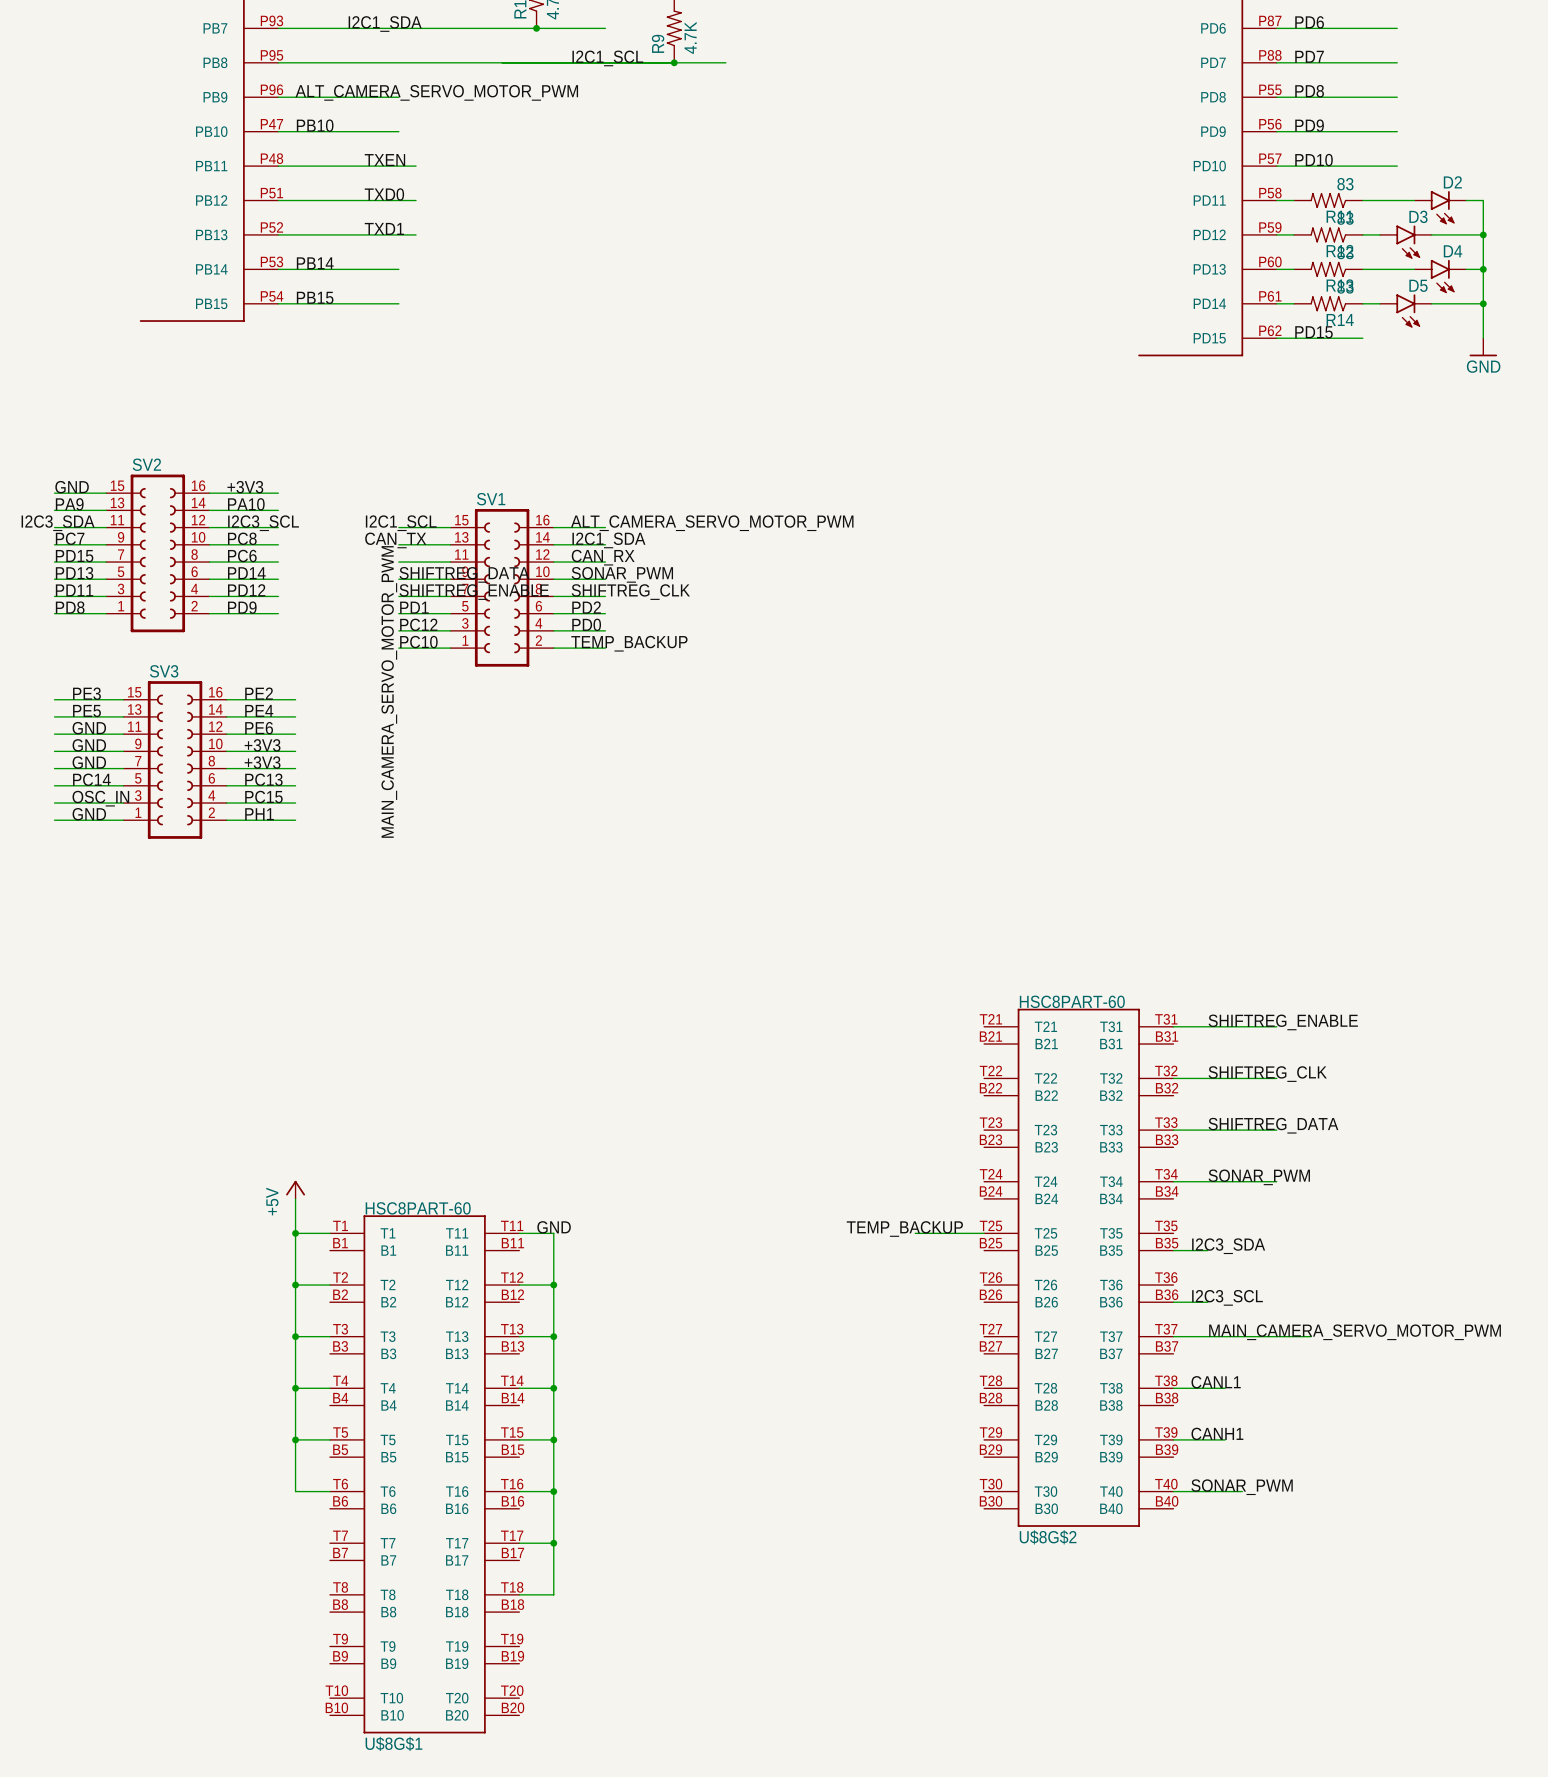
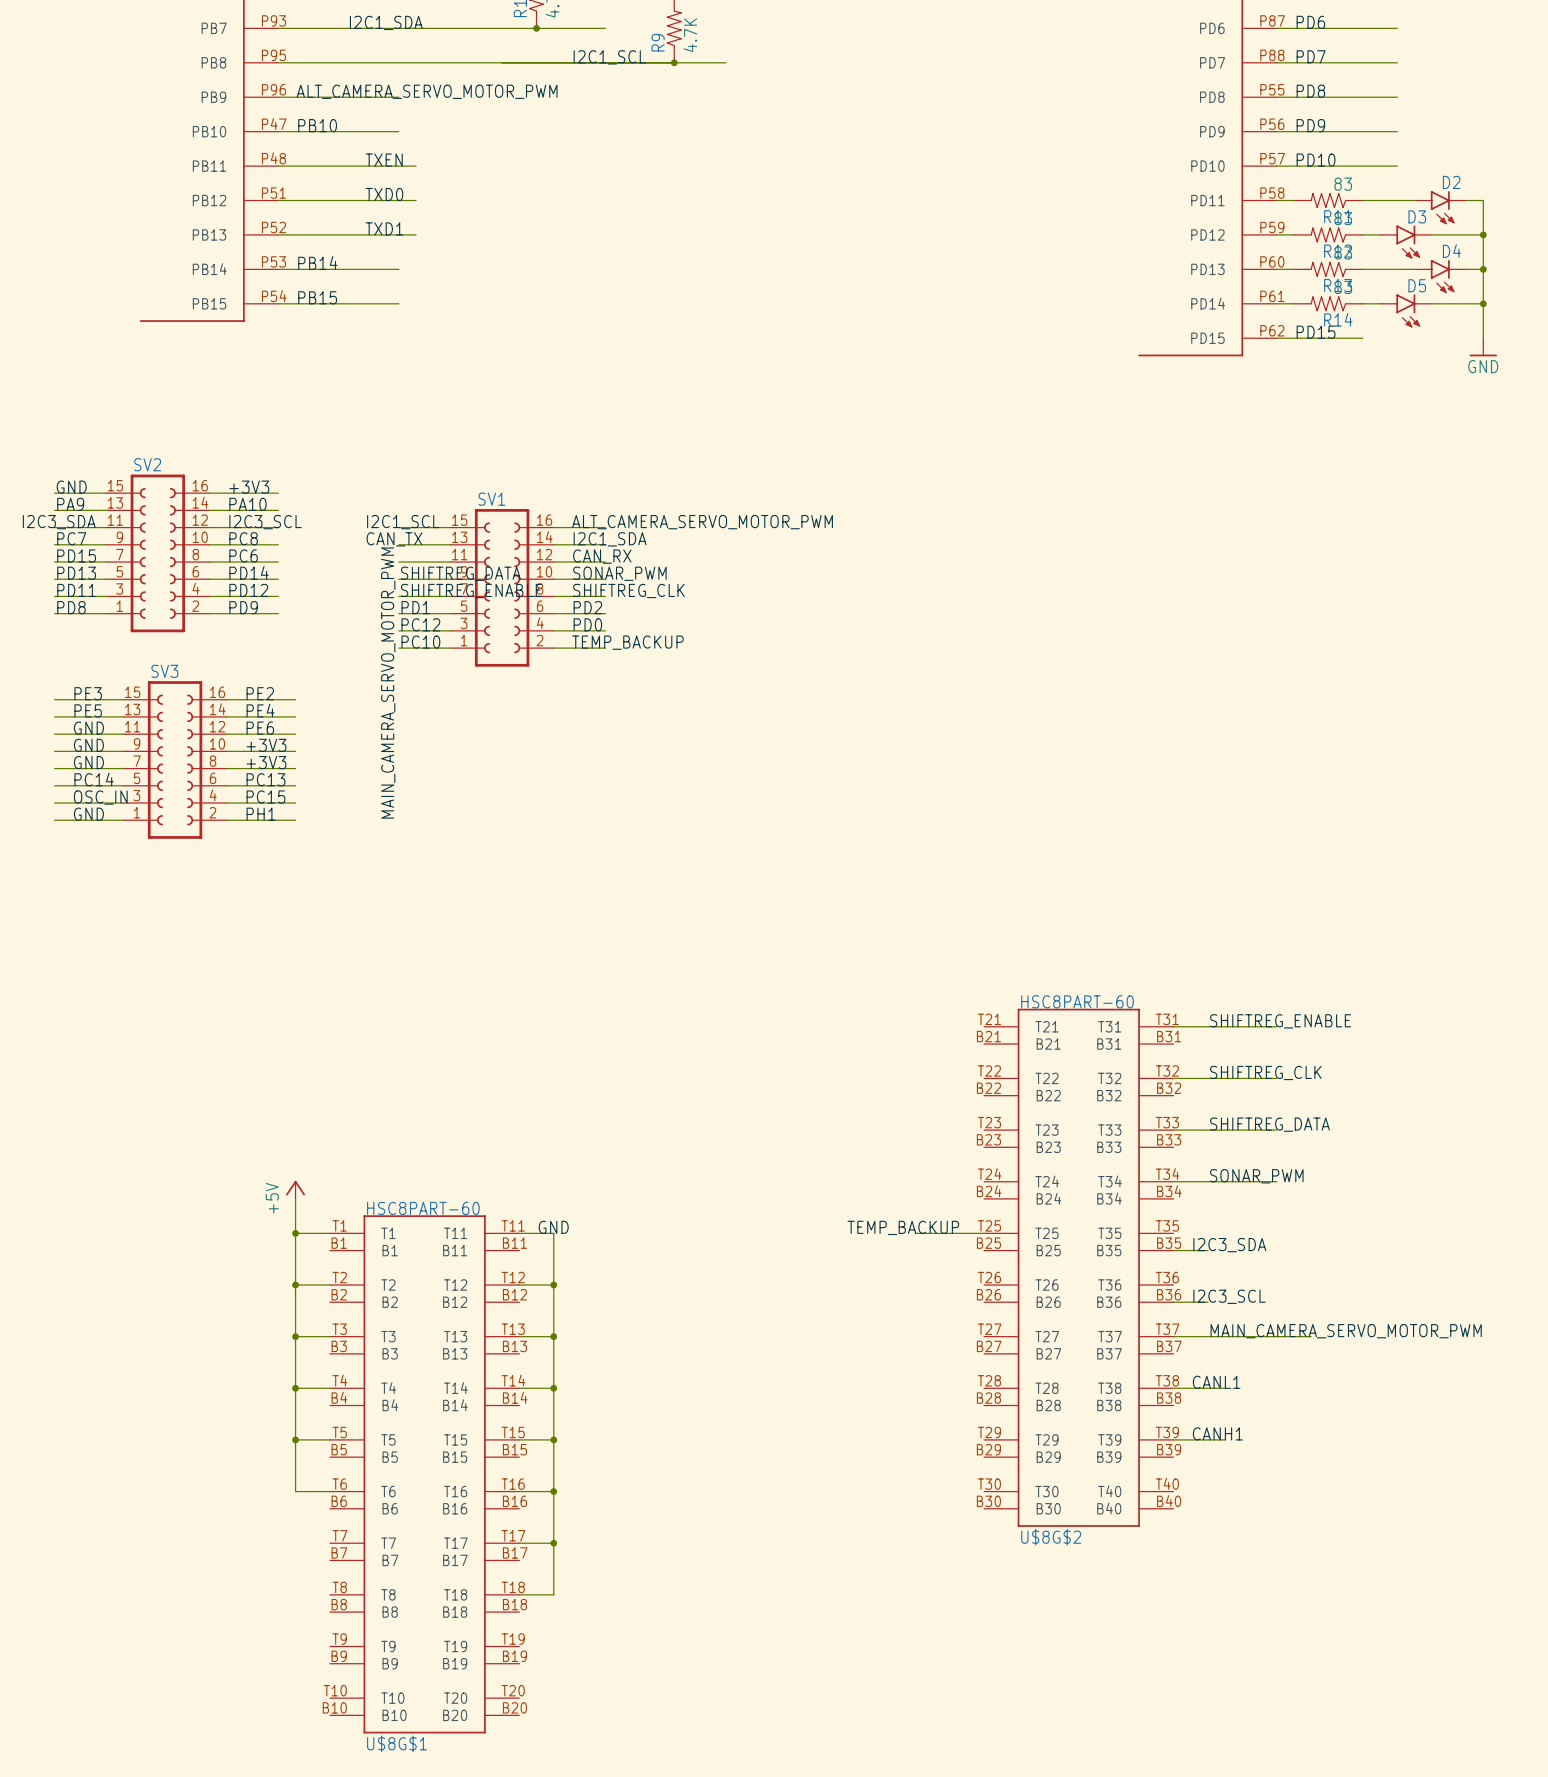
label: SONAR_PWM (1242, 1487) -> none
wire: (1173, 1491) (1242, 1491) -> none

